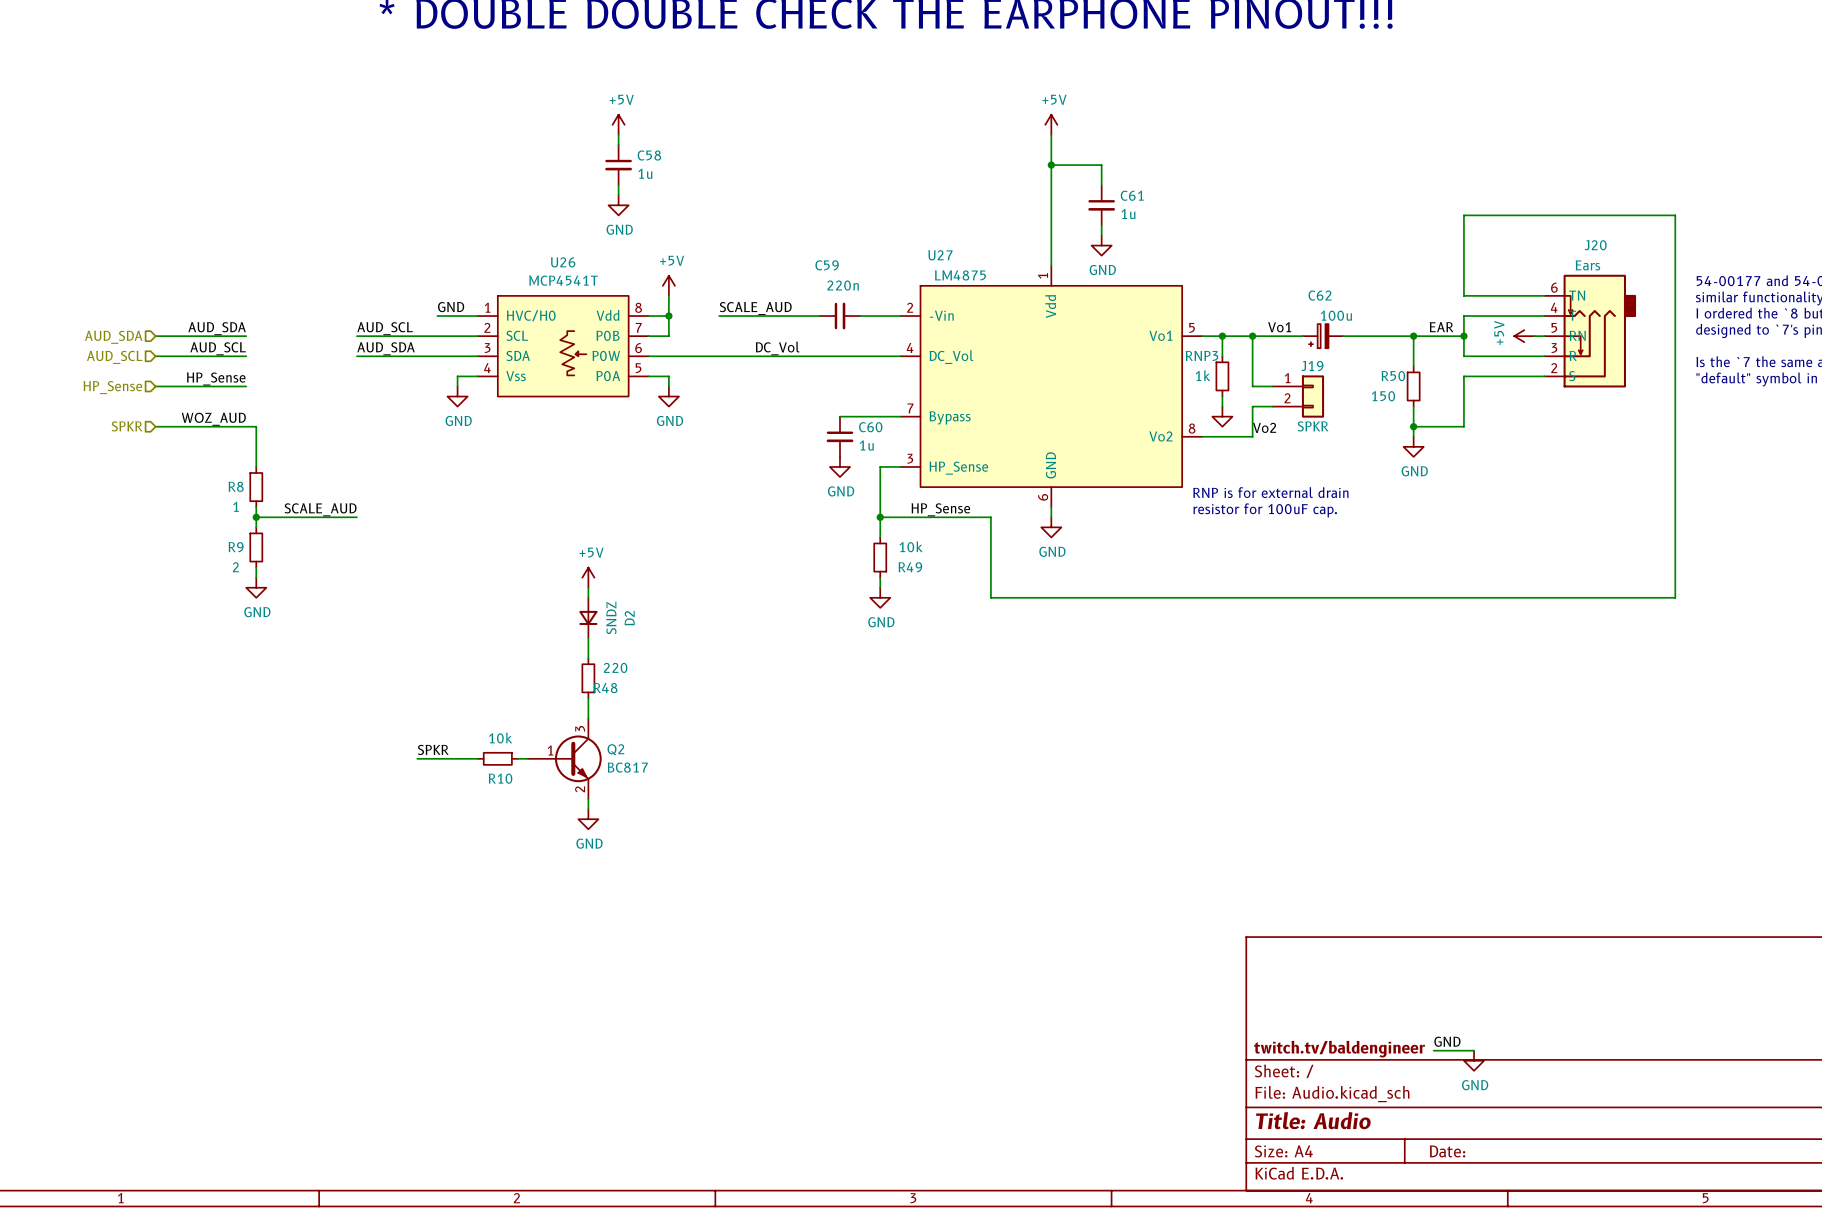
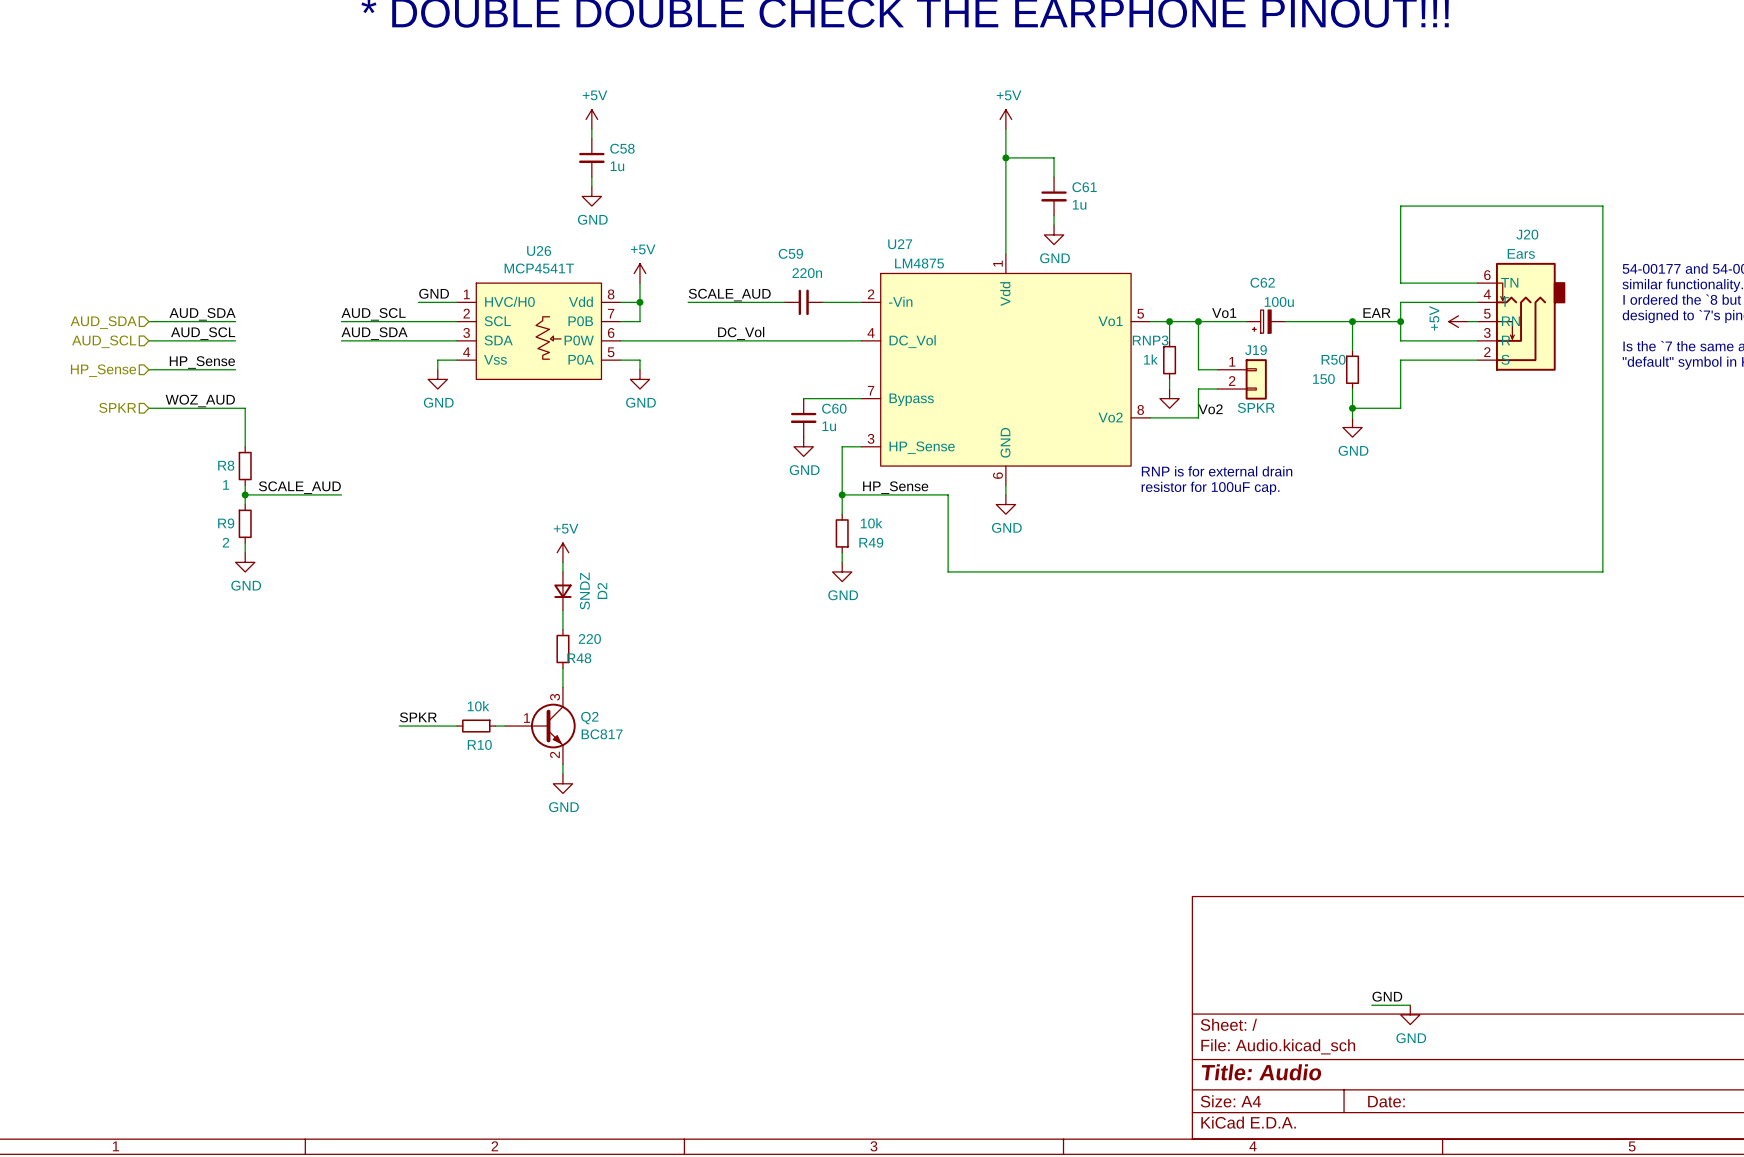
title block: twitch.tv/baldengineer (1339, 1049) -> none

